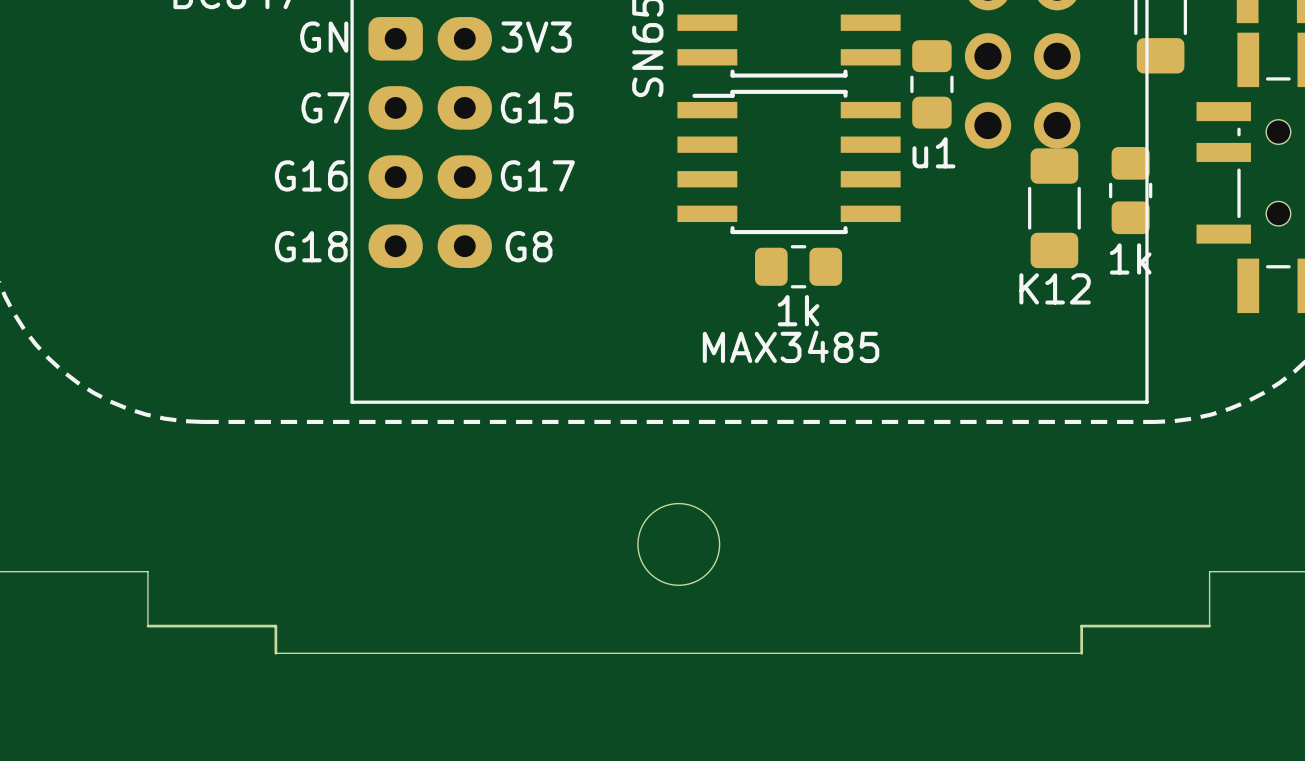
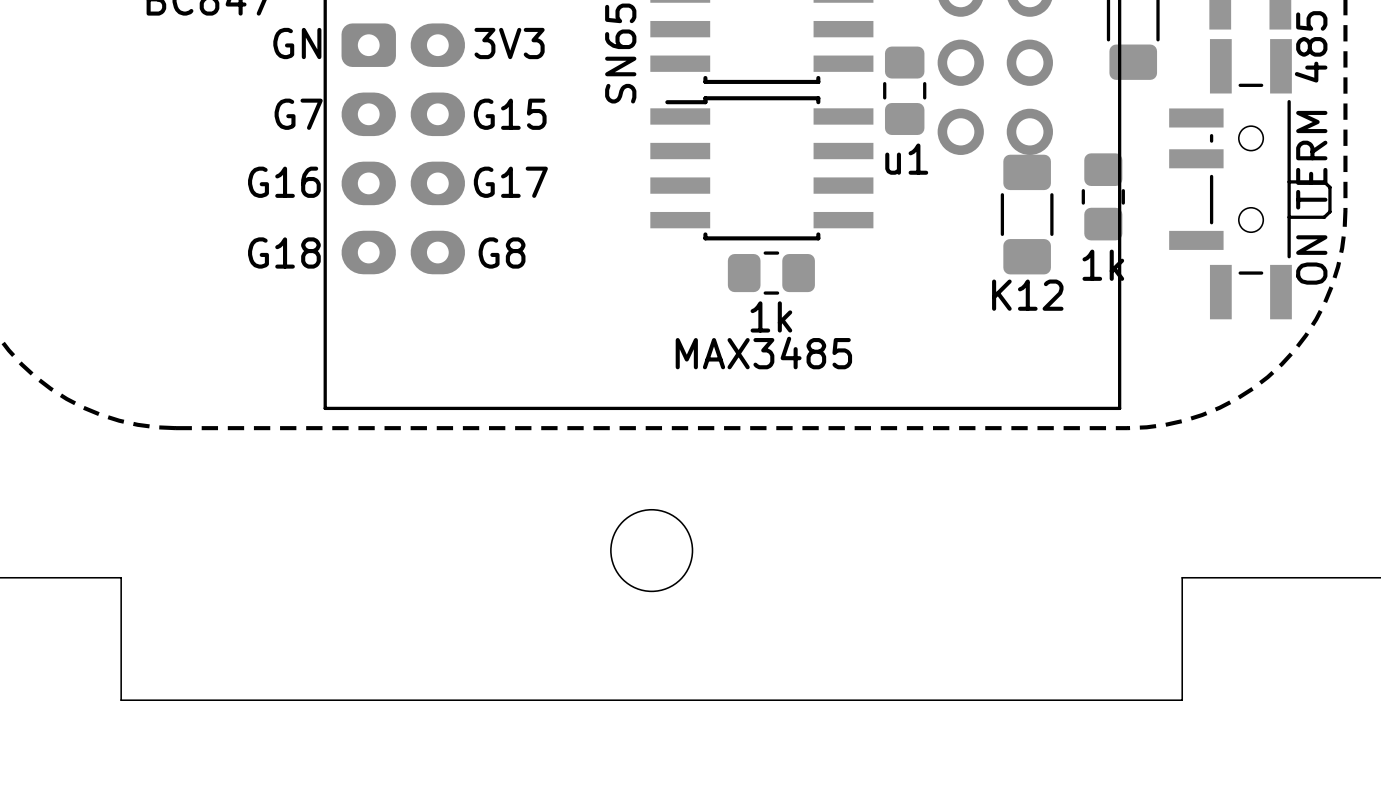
board edge: (147, 626) (275, 626) (275, 653) (1081, 653) (1081, 626) (1209, 626) -> (121, 632) (121, 700) (1182, 700) (1182, 632)

